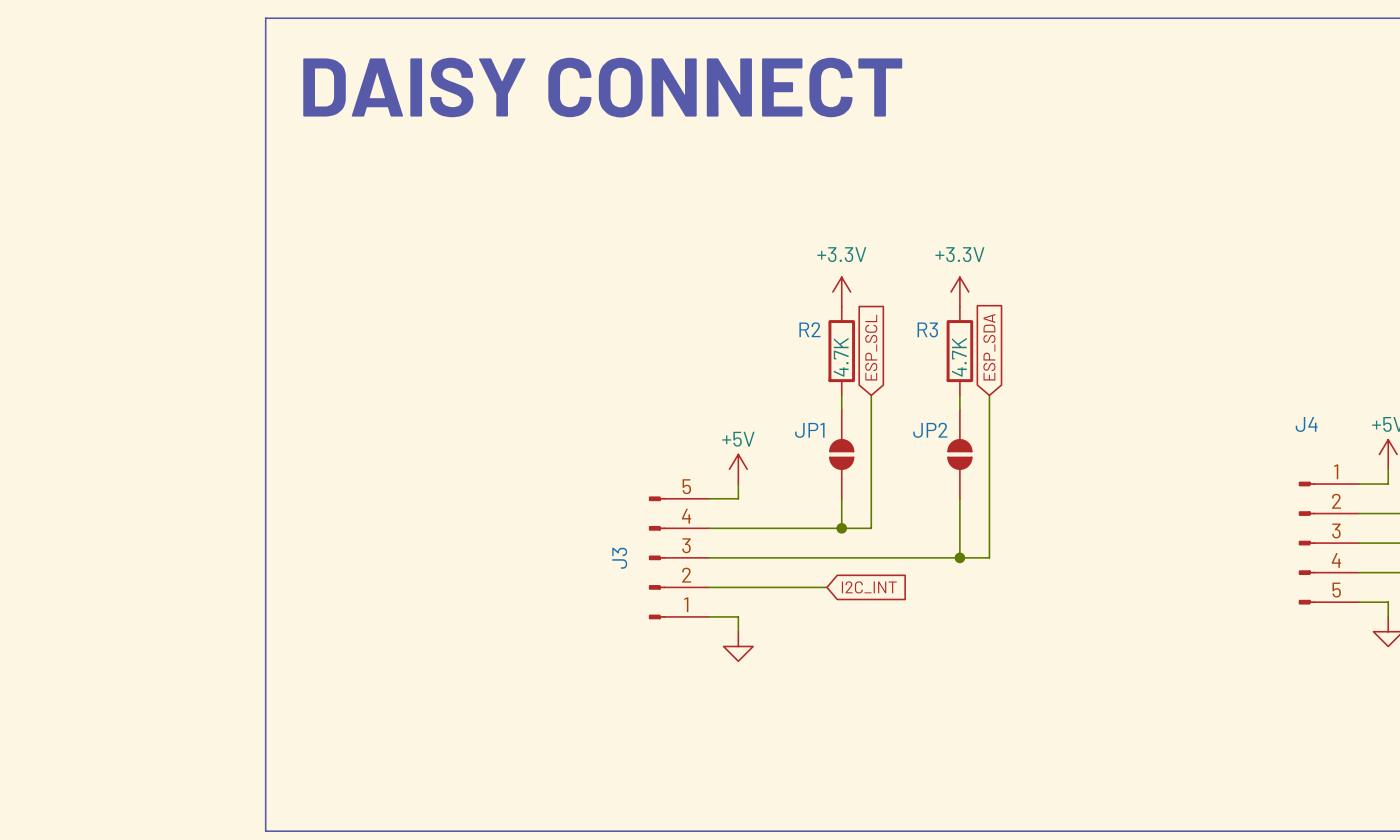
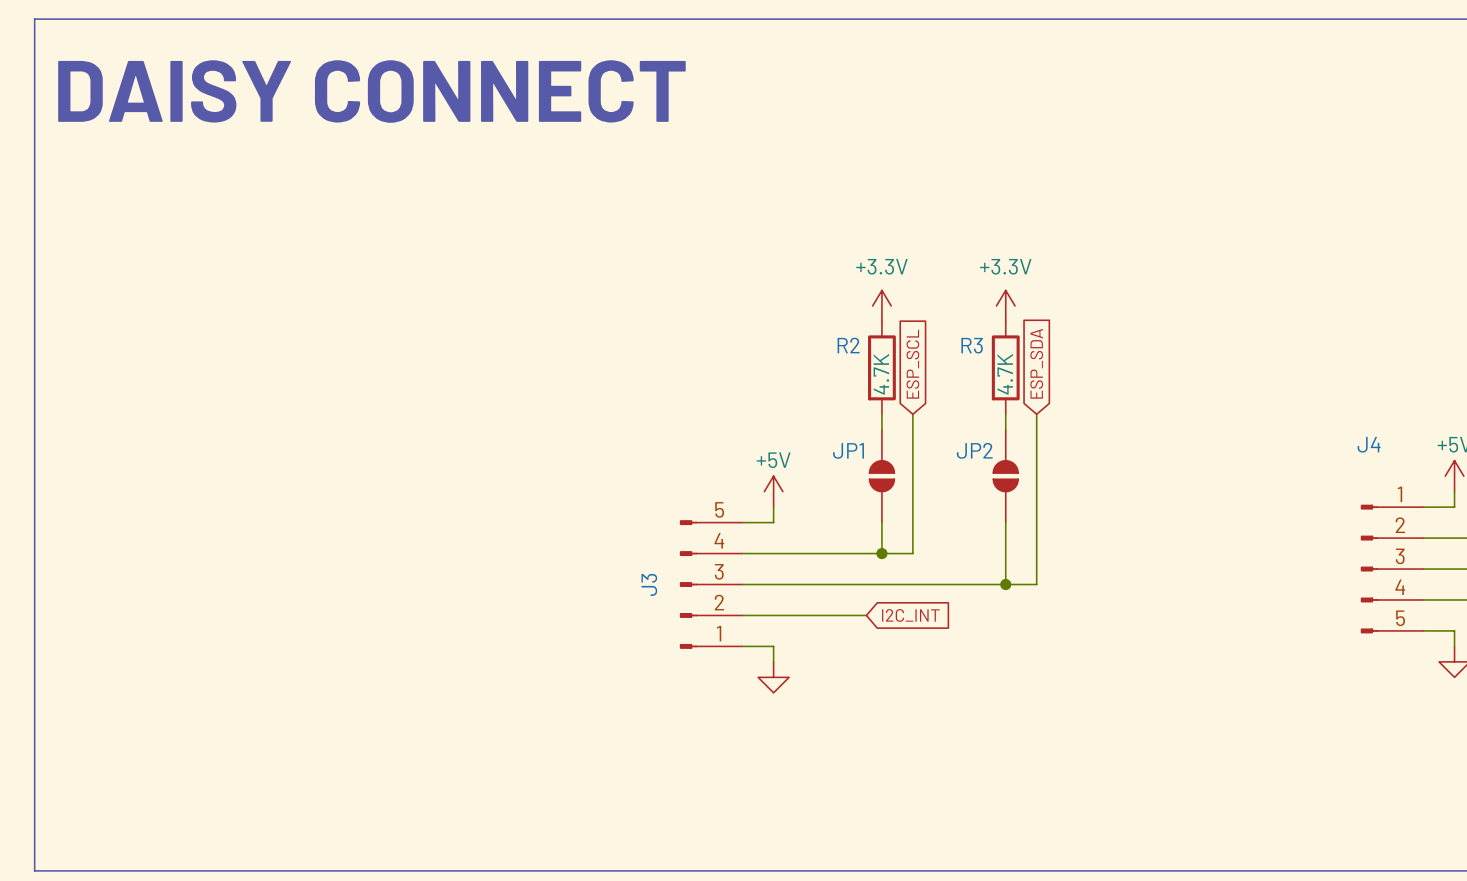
line: (265, 18) (265, 831) -> (278, 19) (34, 19) (34, 870) (278, 870)
text position: DAISY CONNECT (602, 87) -> DAISY CONNECT (371, 91)

